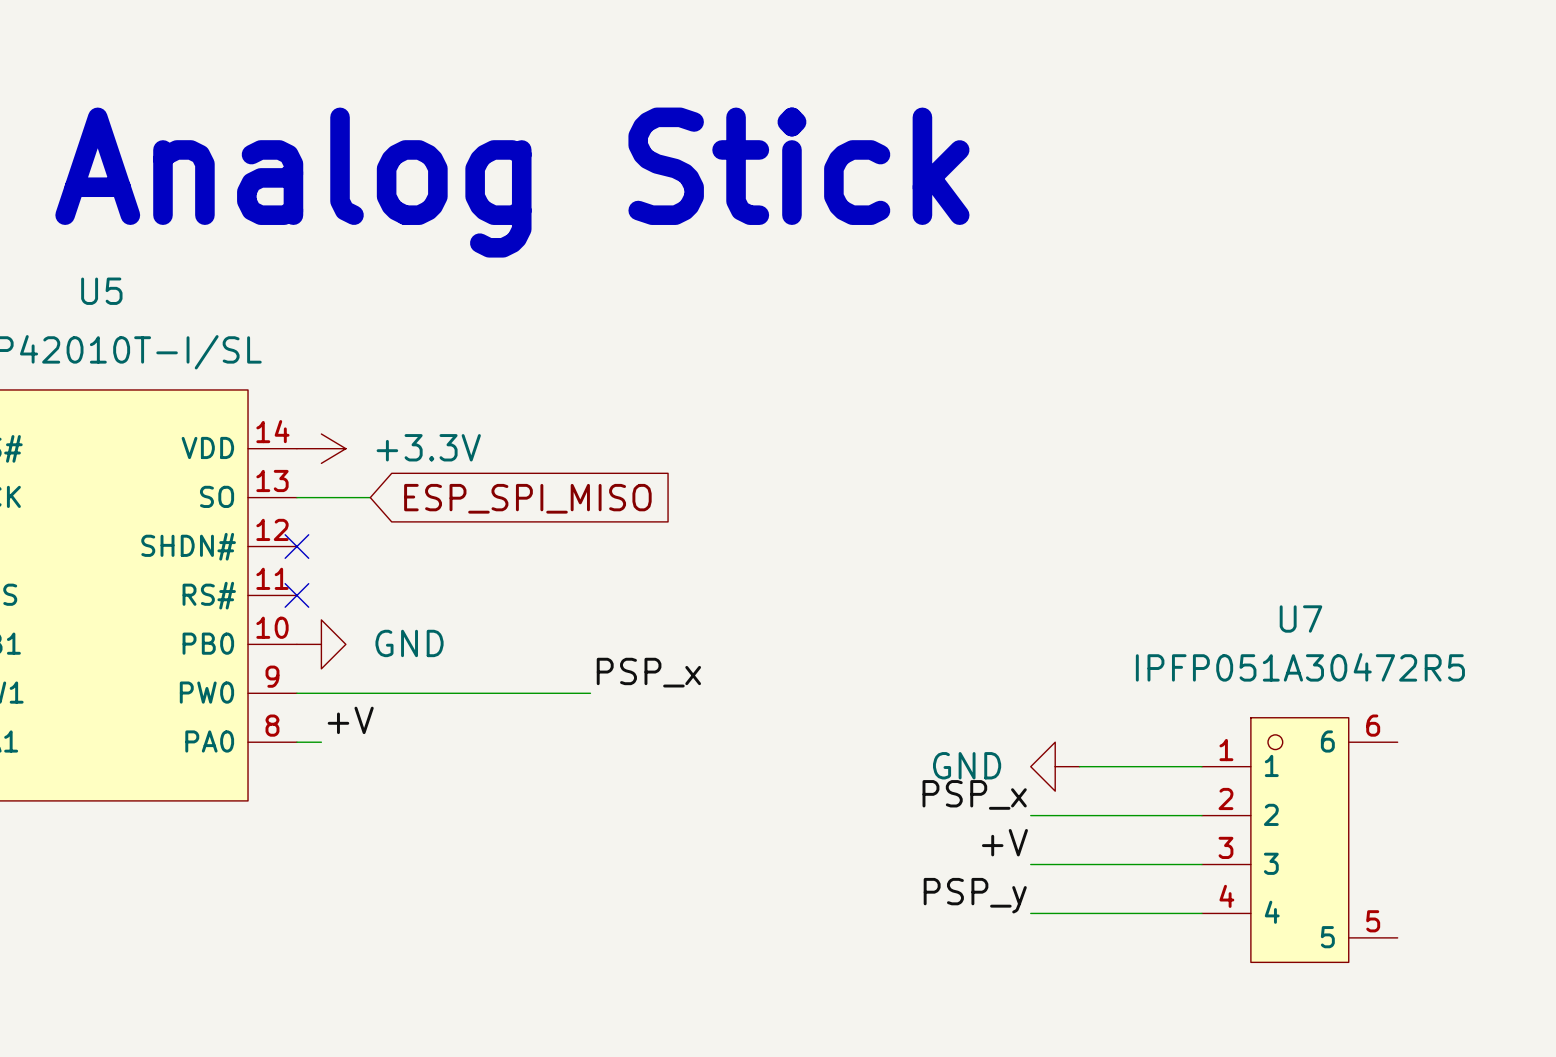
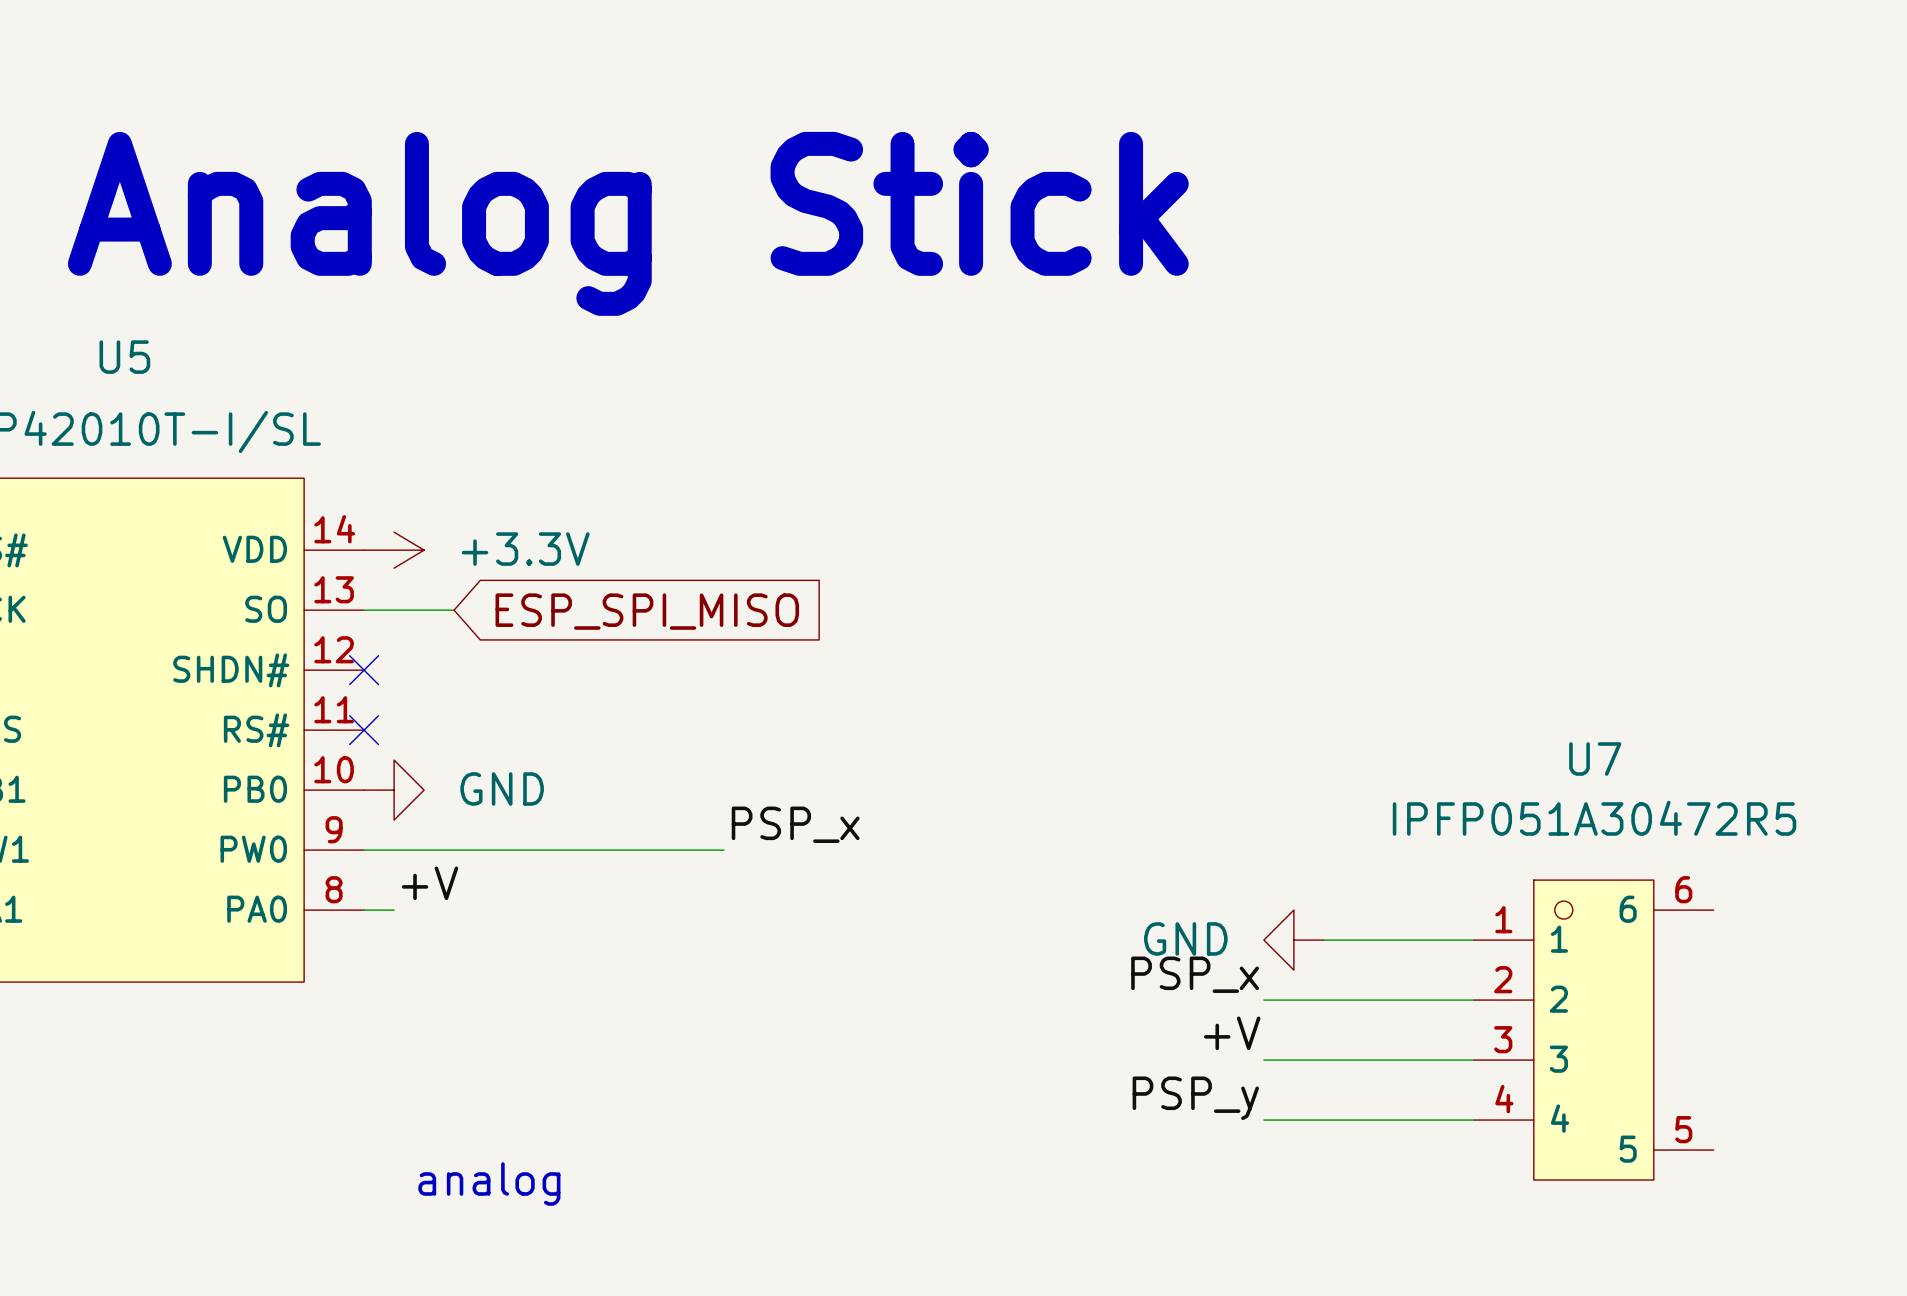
text: none -> analog (489, 1183)

